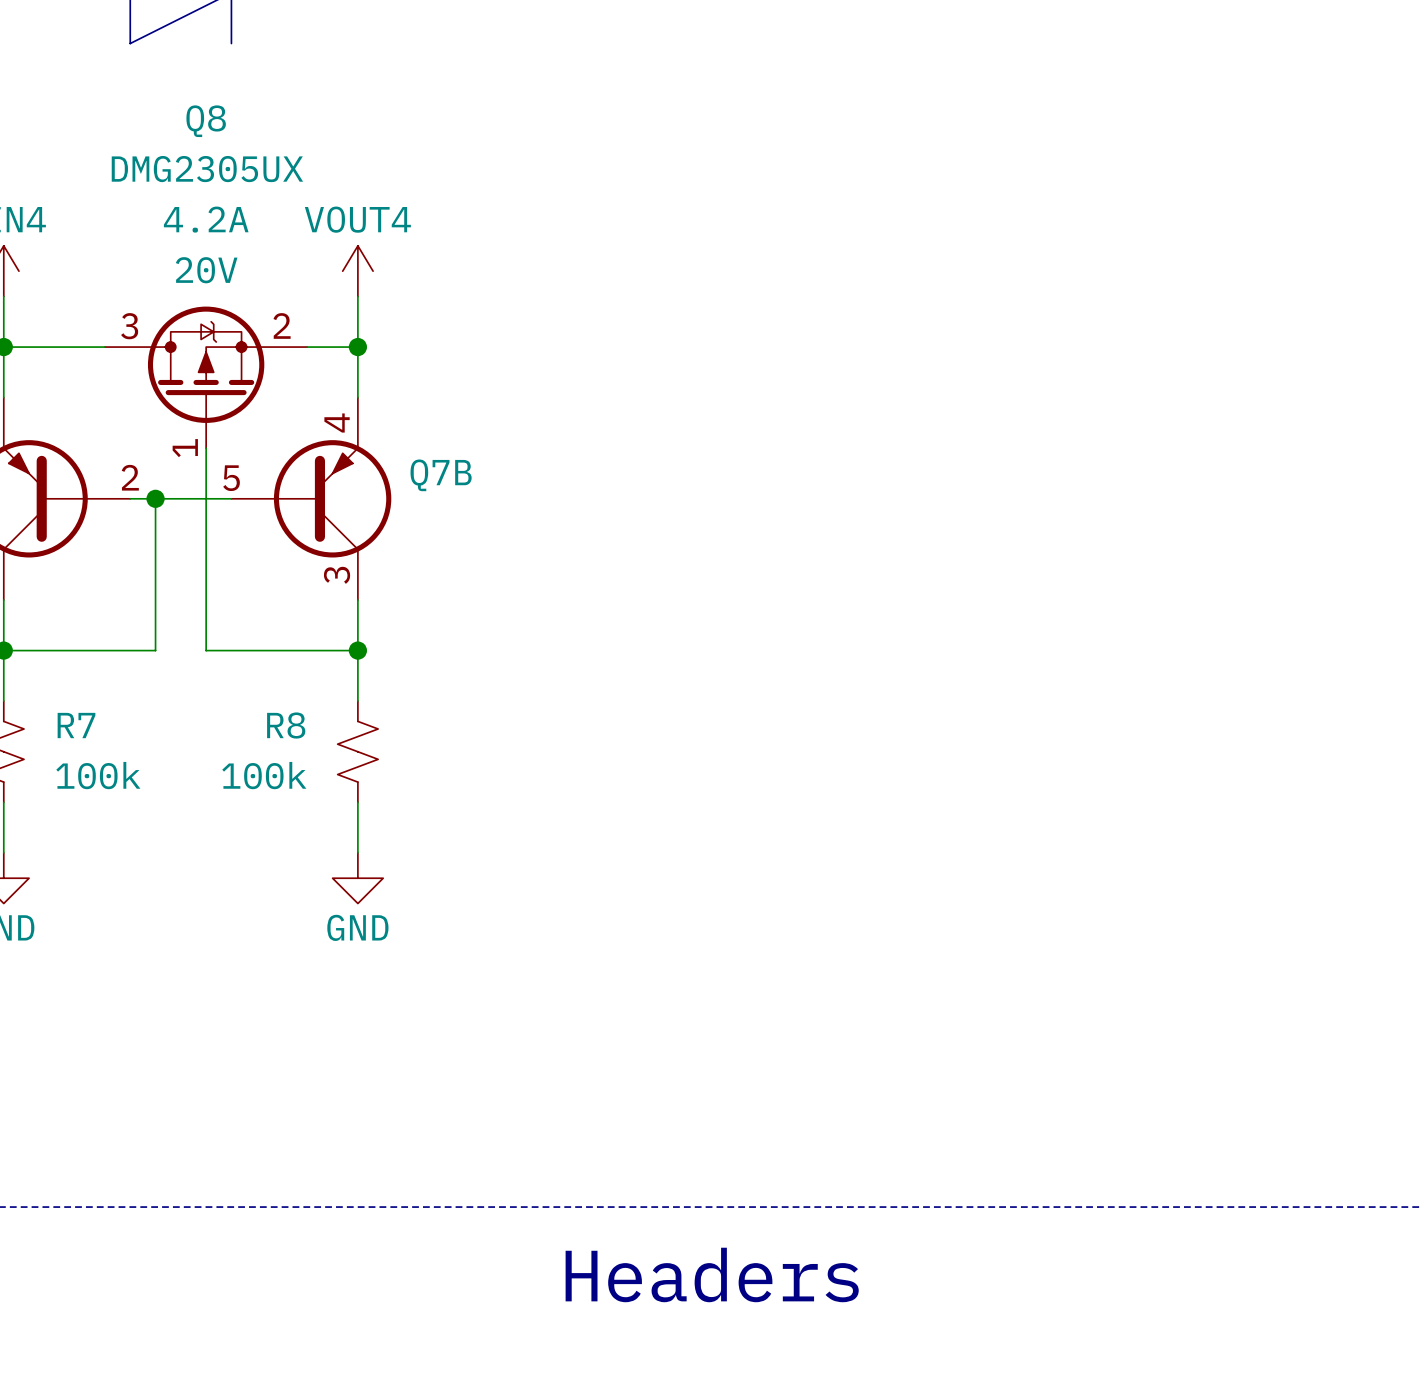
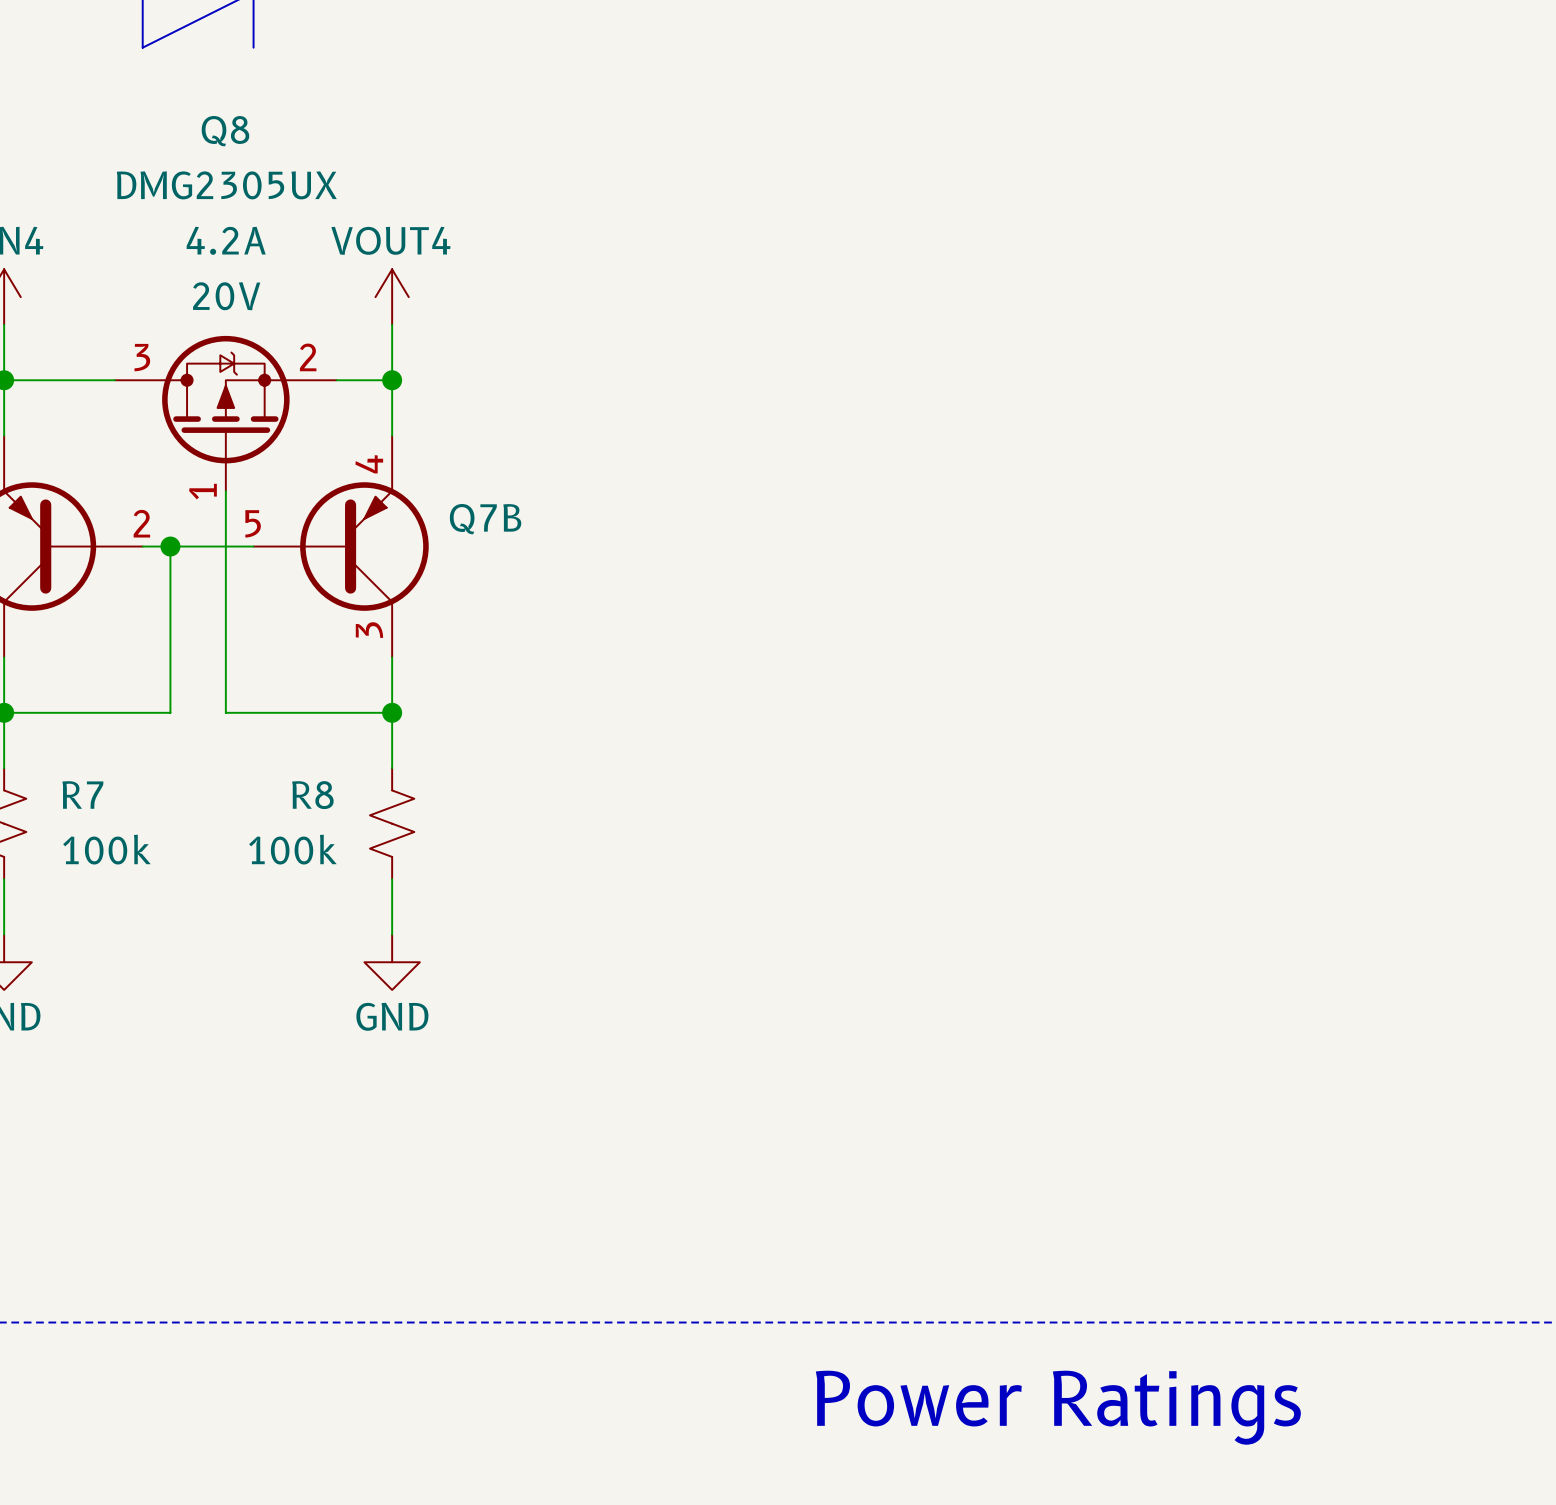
text: Headers (712, 1274) -> none
text: none -> Power Ratings (1058, 1407)

